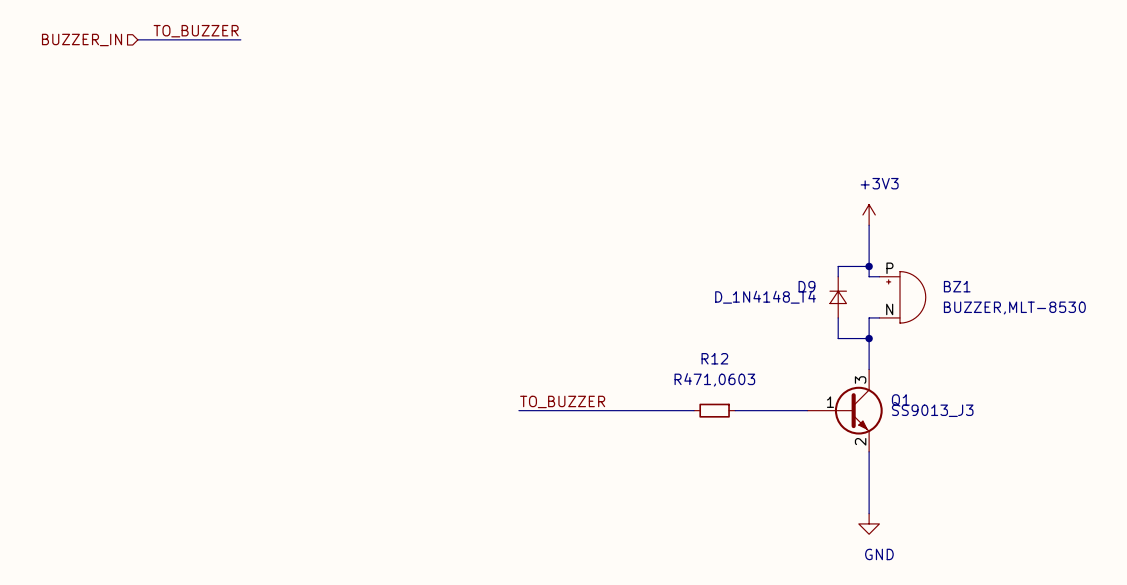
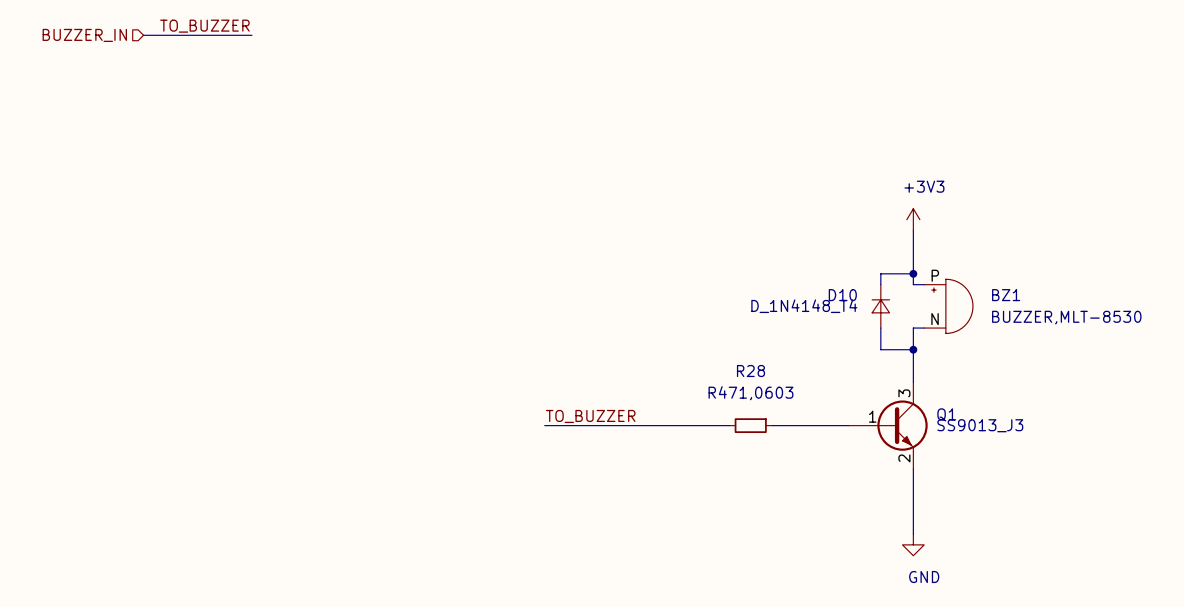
D9 name: D9 (806, 286) -> D10 (842, 295)
R12 name: R12 (714, 358) -> R28 (750, 371)

